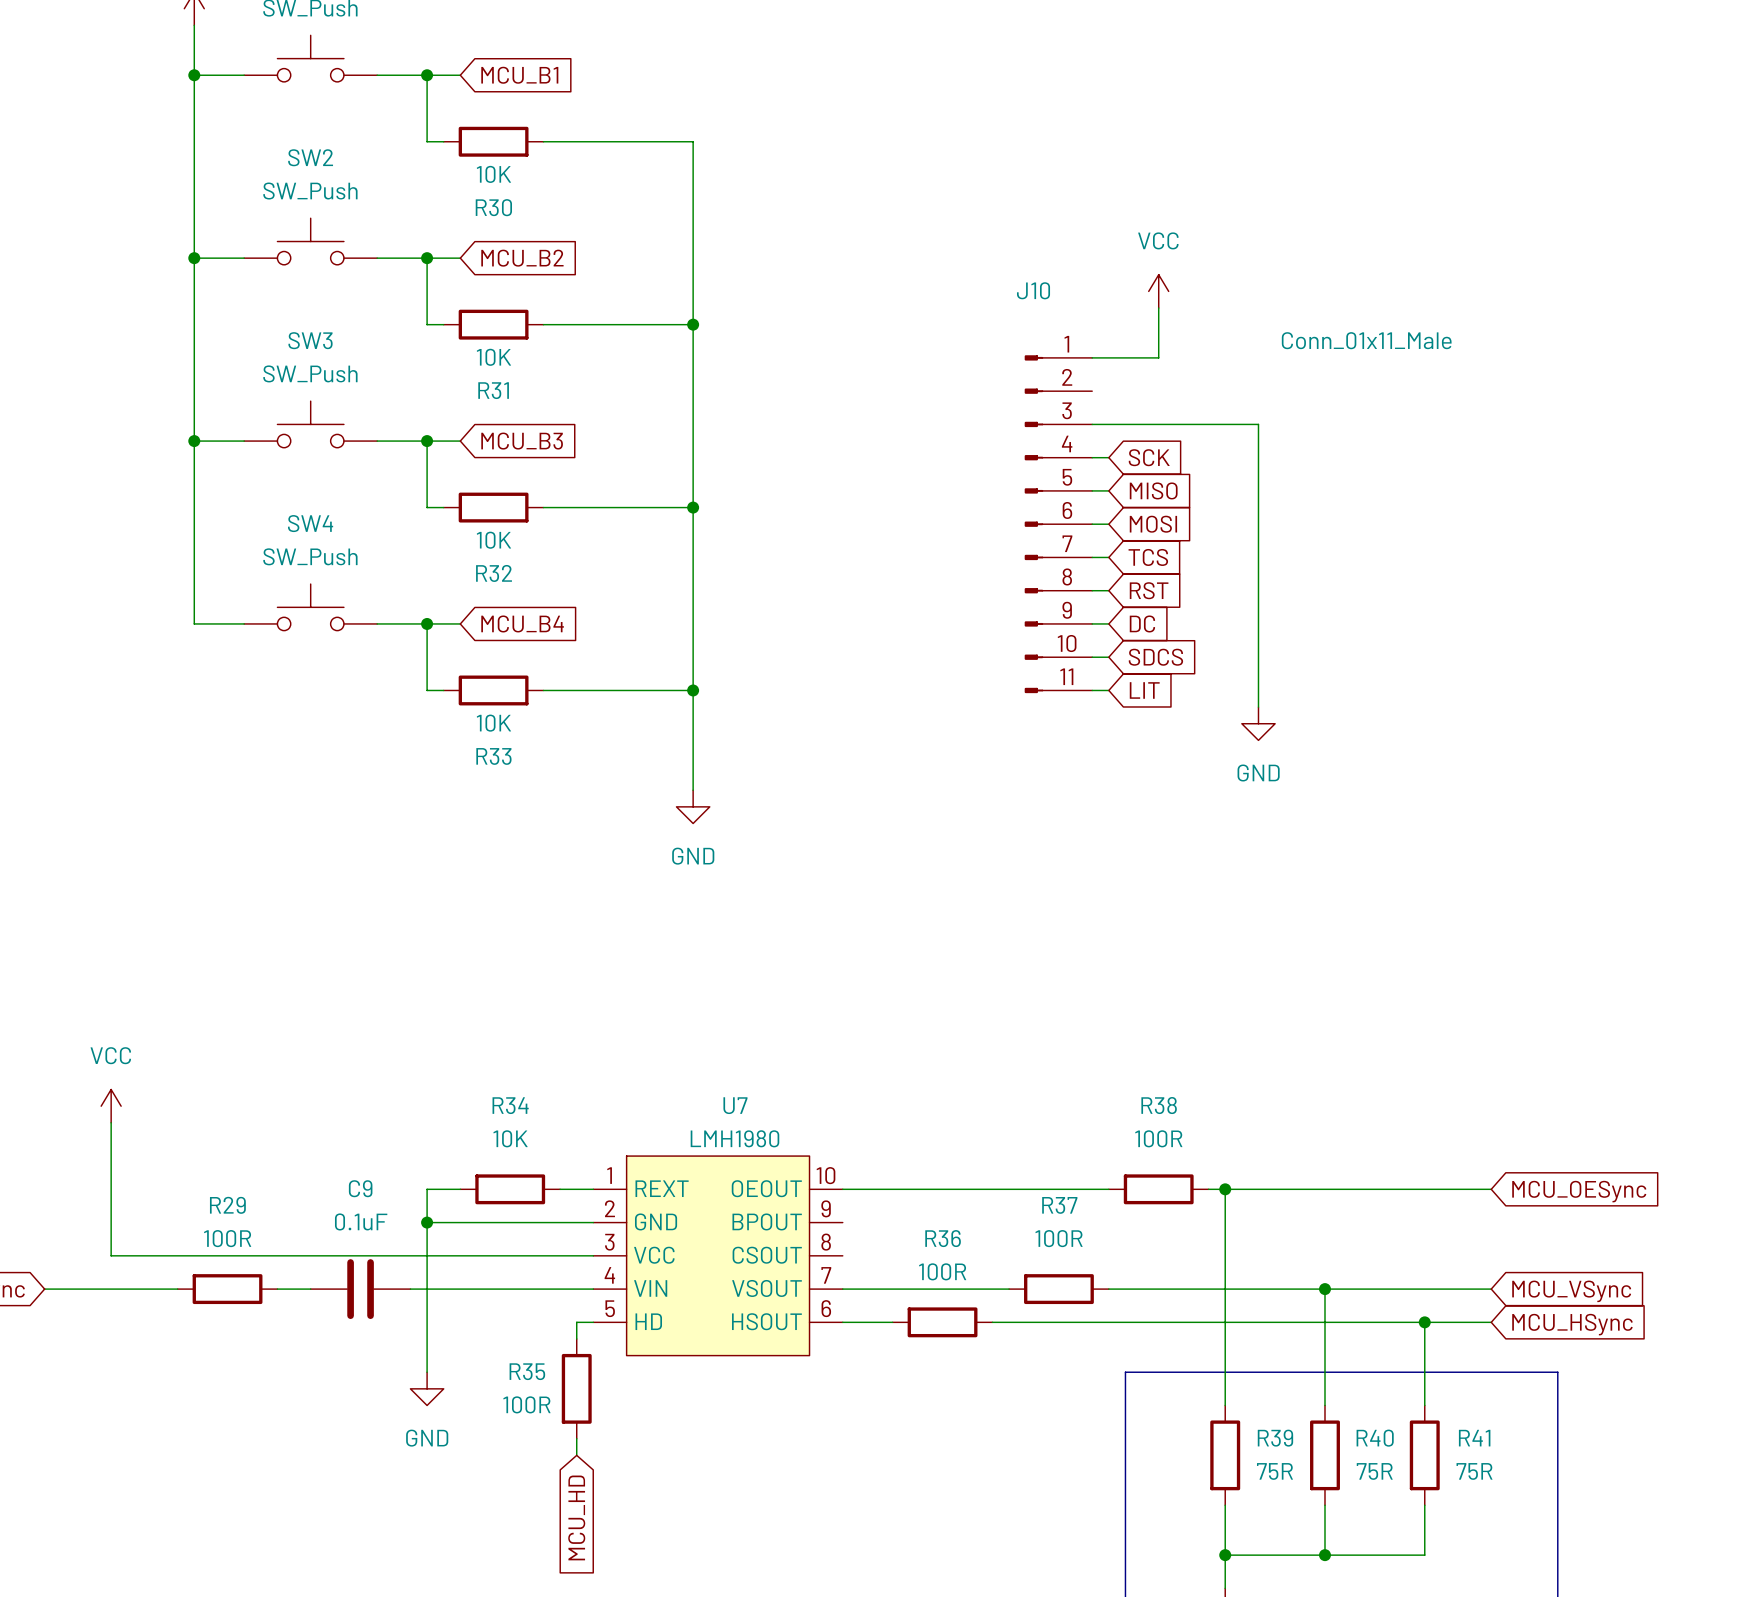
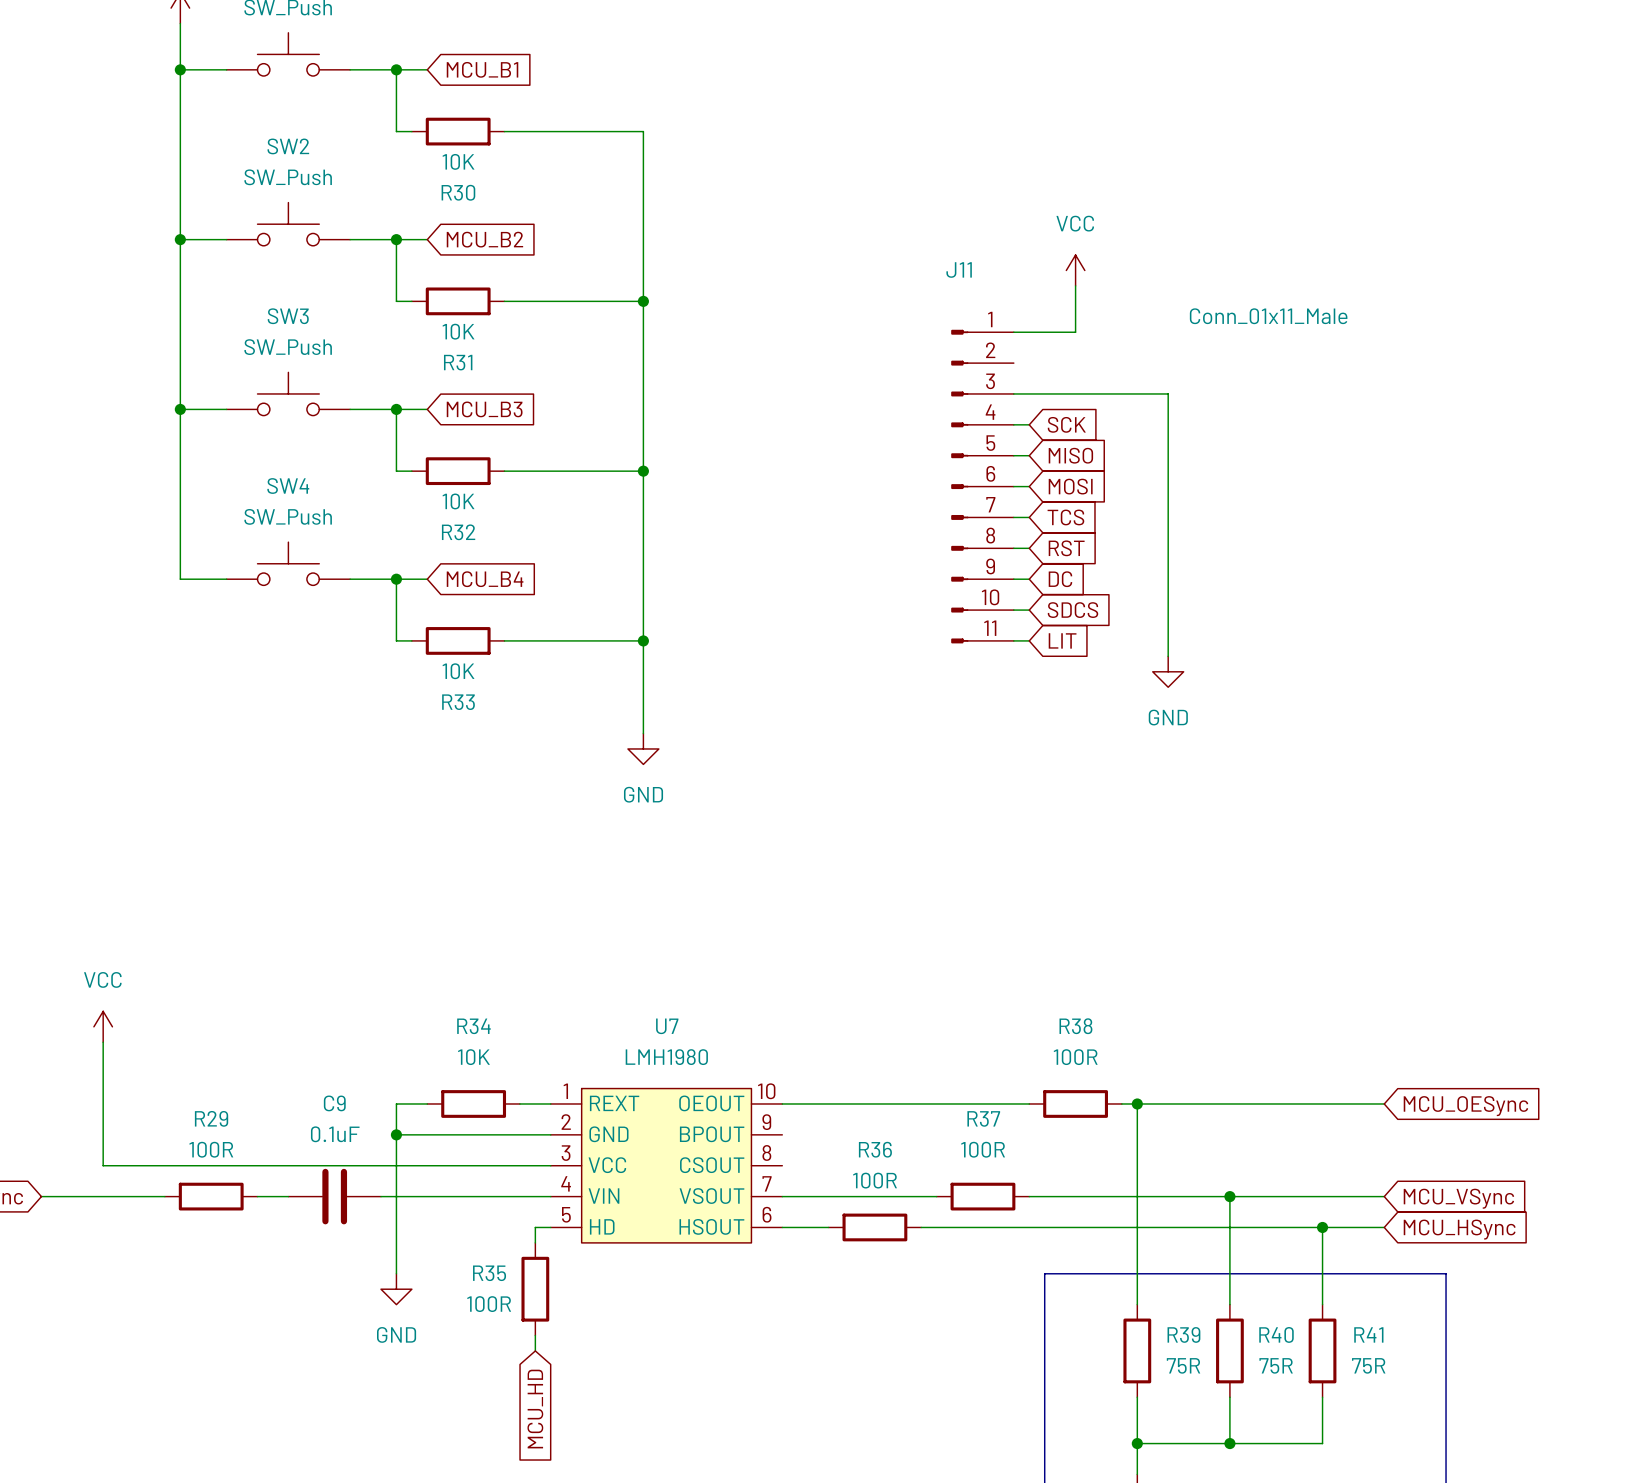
J10 name: J10 (1033, 290) -> J11 (959, 270)
U7 symbol: [593, 1156, 843, 1356] -> [550, 1088, 783, 1243]

